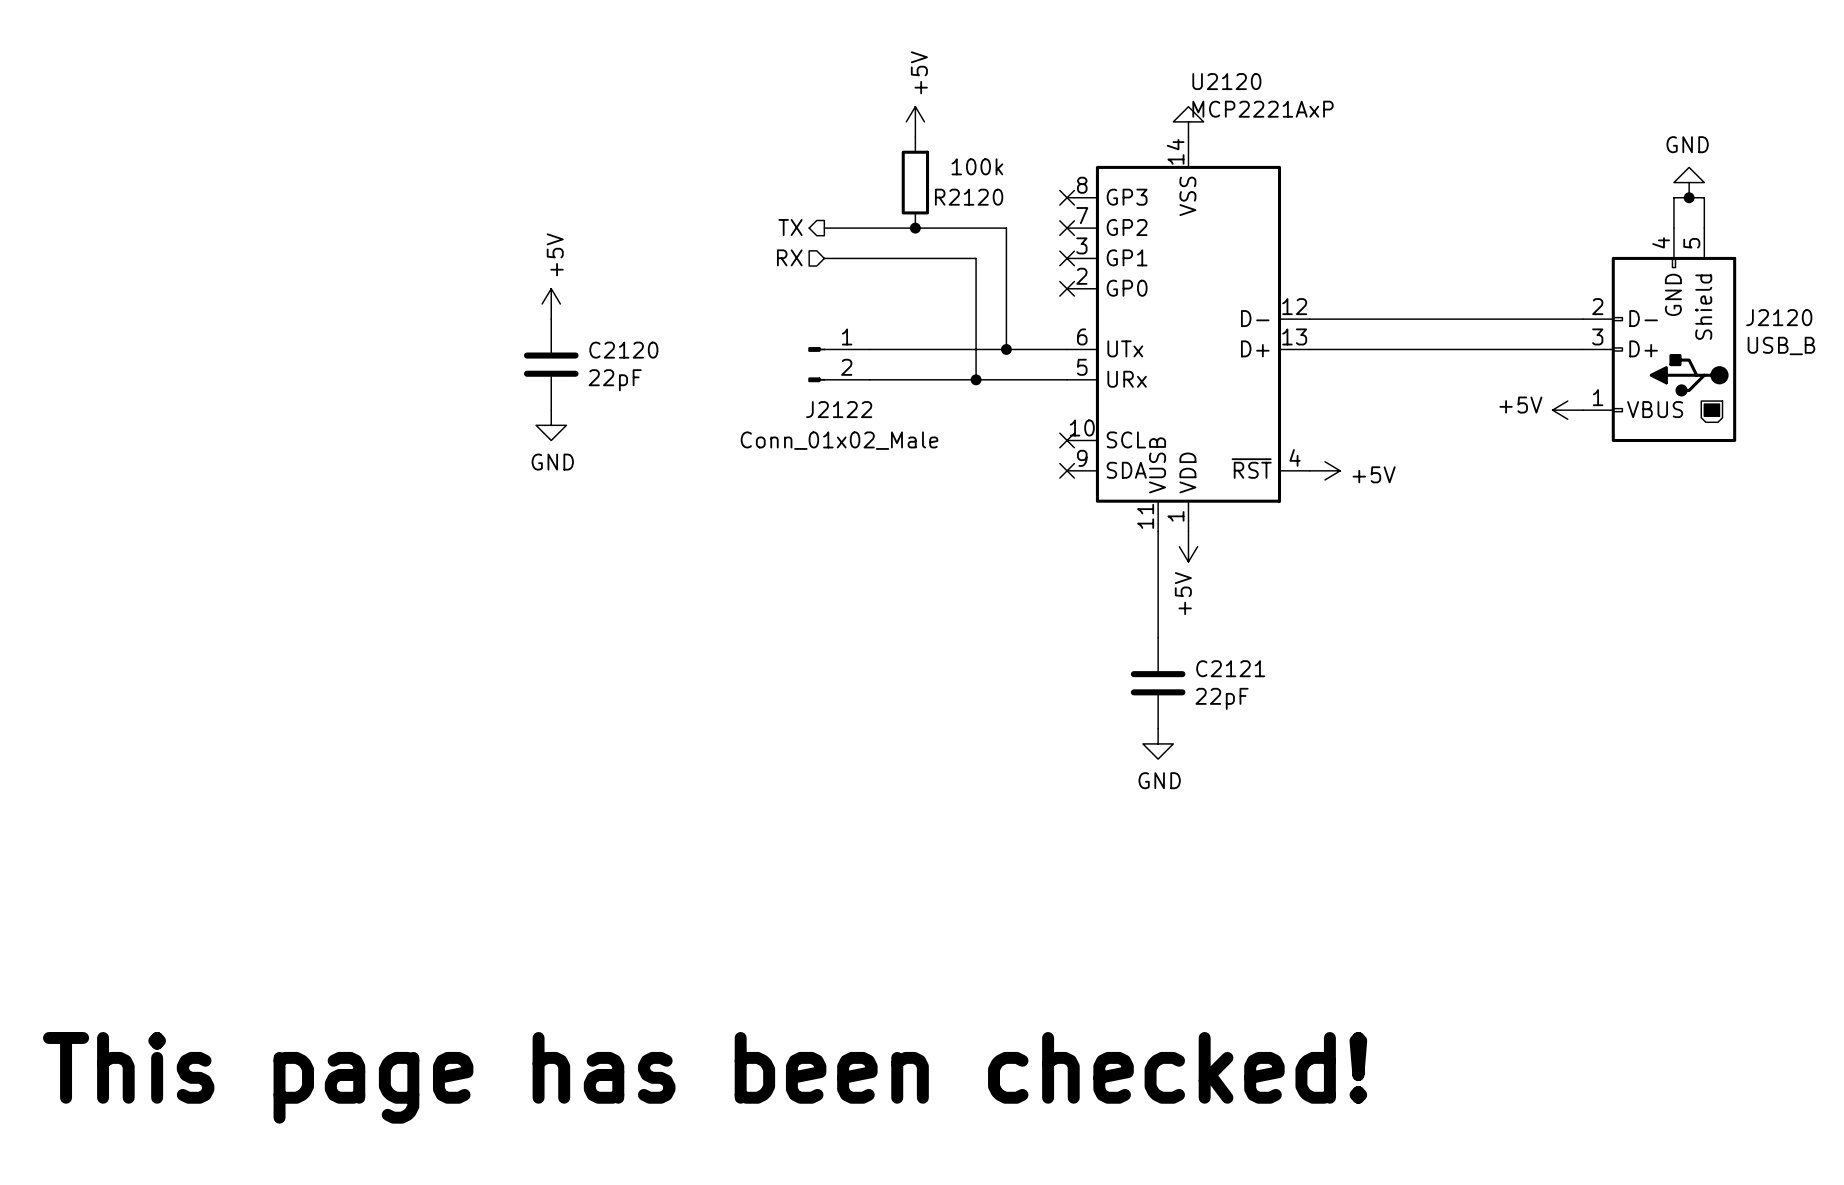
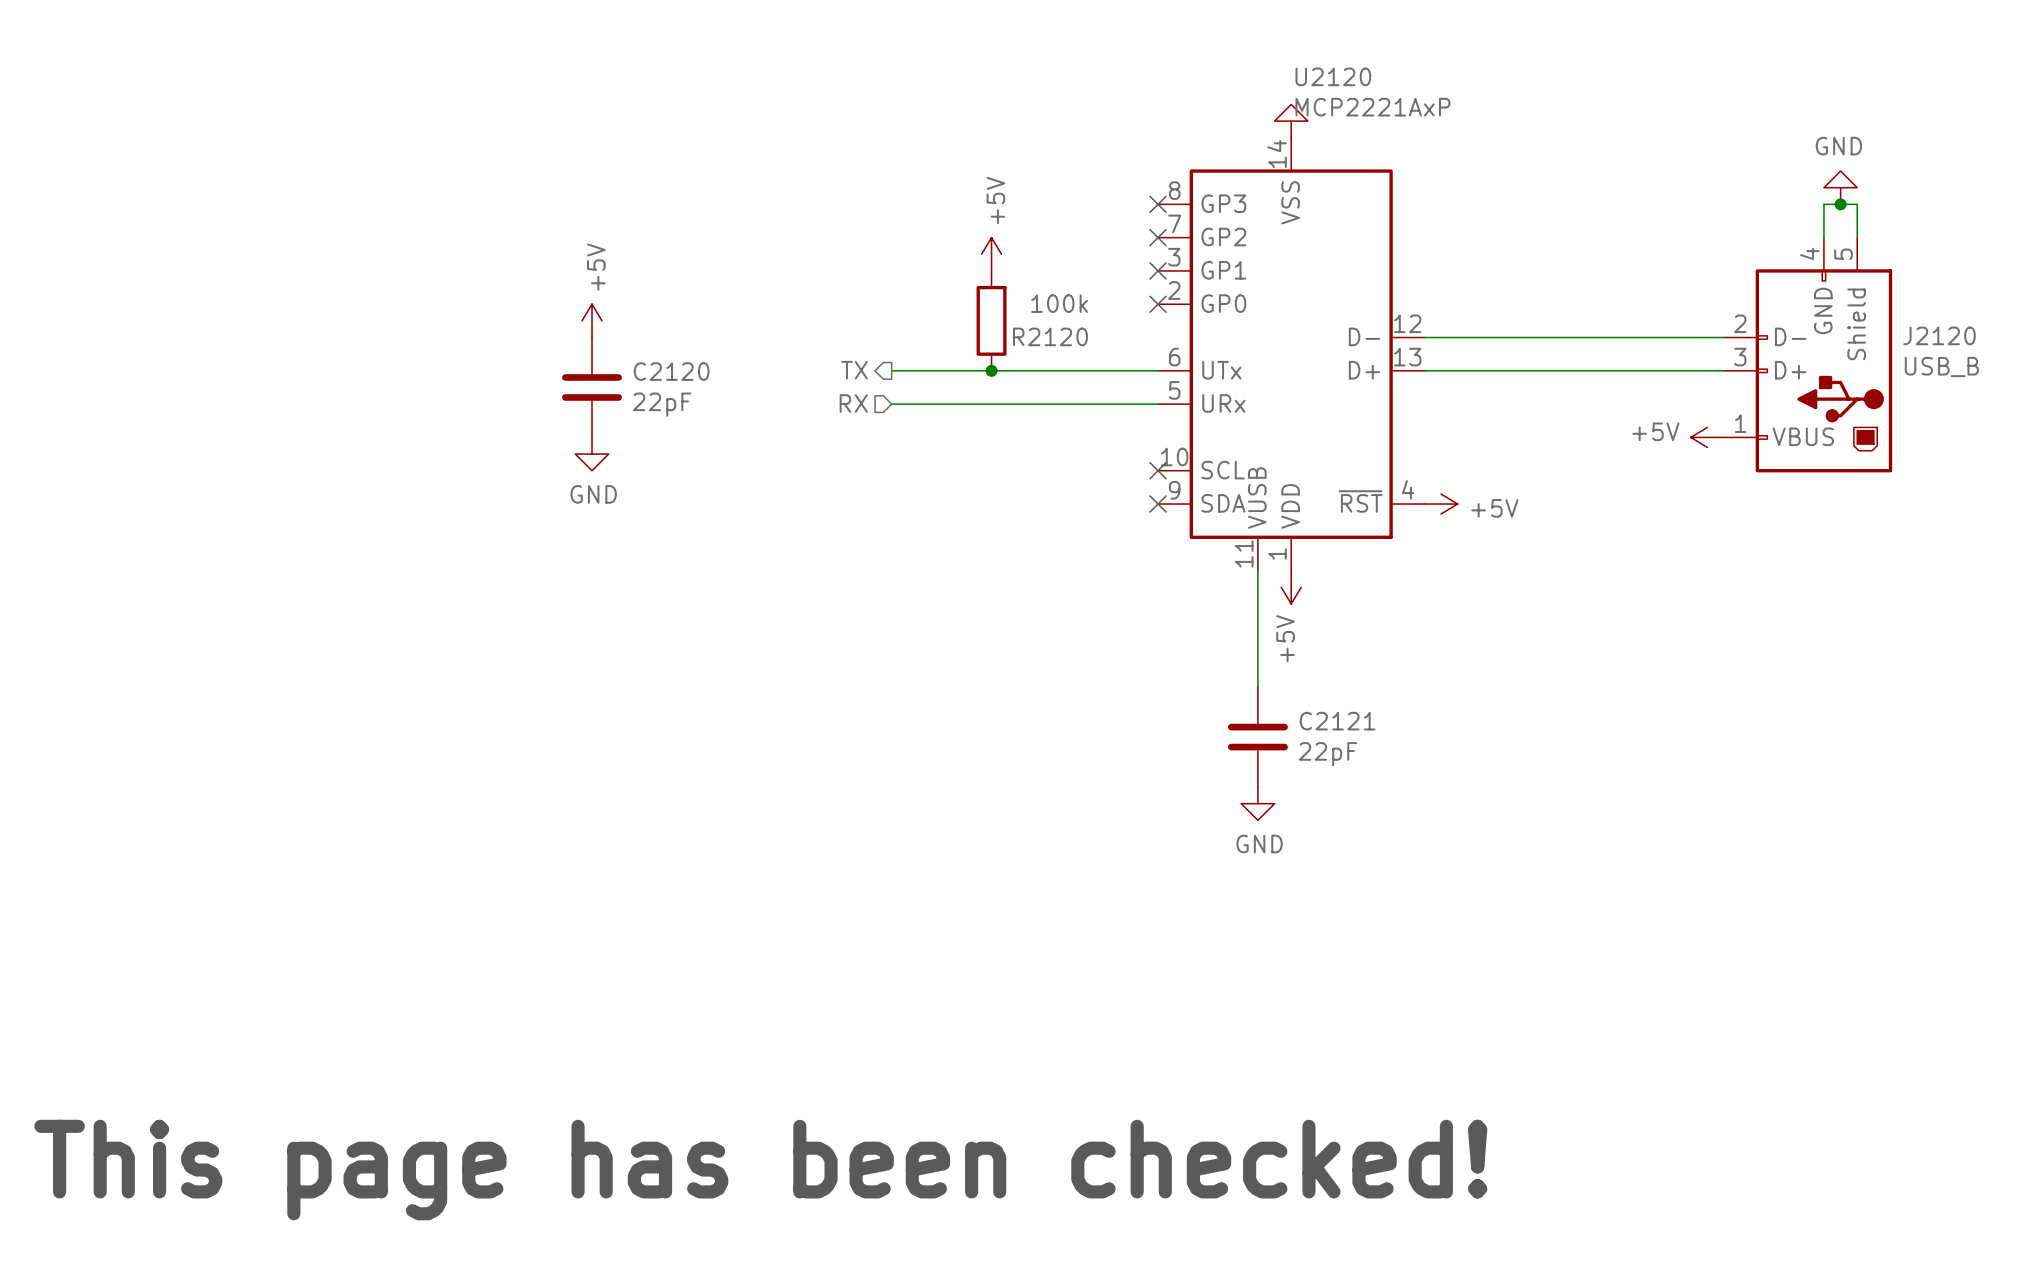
power symbol position: +5V (915, 121) -> +5V (991, 254)
R2120 position: (915, 182) -> (991, 320)
hierarchical label position: TX (790, 227) -> TX (854, 370)
wire: (824, 228) (1006, 228) (1006, 349) -> none
junction: (915, 228) -> none
hierarchical label position: RX (789, 257) -> RX (853, 403)
wire: (824, 258) (976, 258) (976, 379) -> none
junction: none -> (991, 370)
junction: (1006, 349) -> none
J2122: Conn_01x02_Male (839, 364) -> none
junction: (976, 379) -> none

